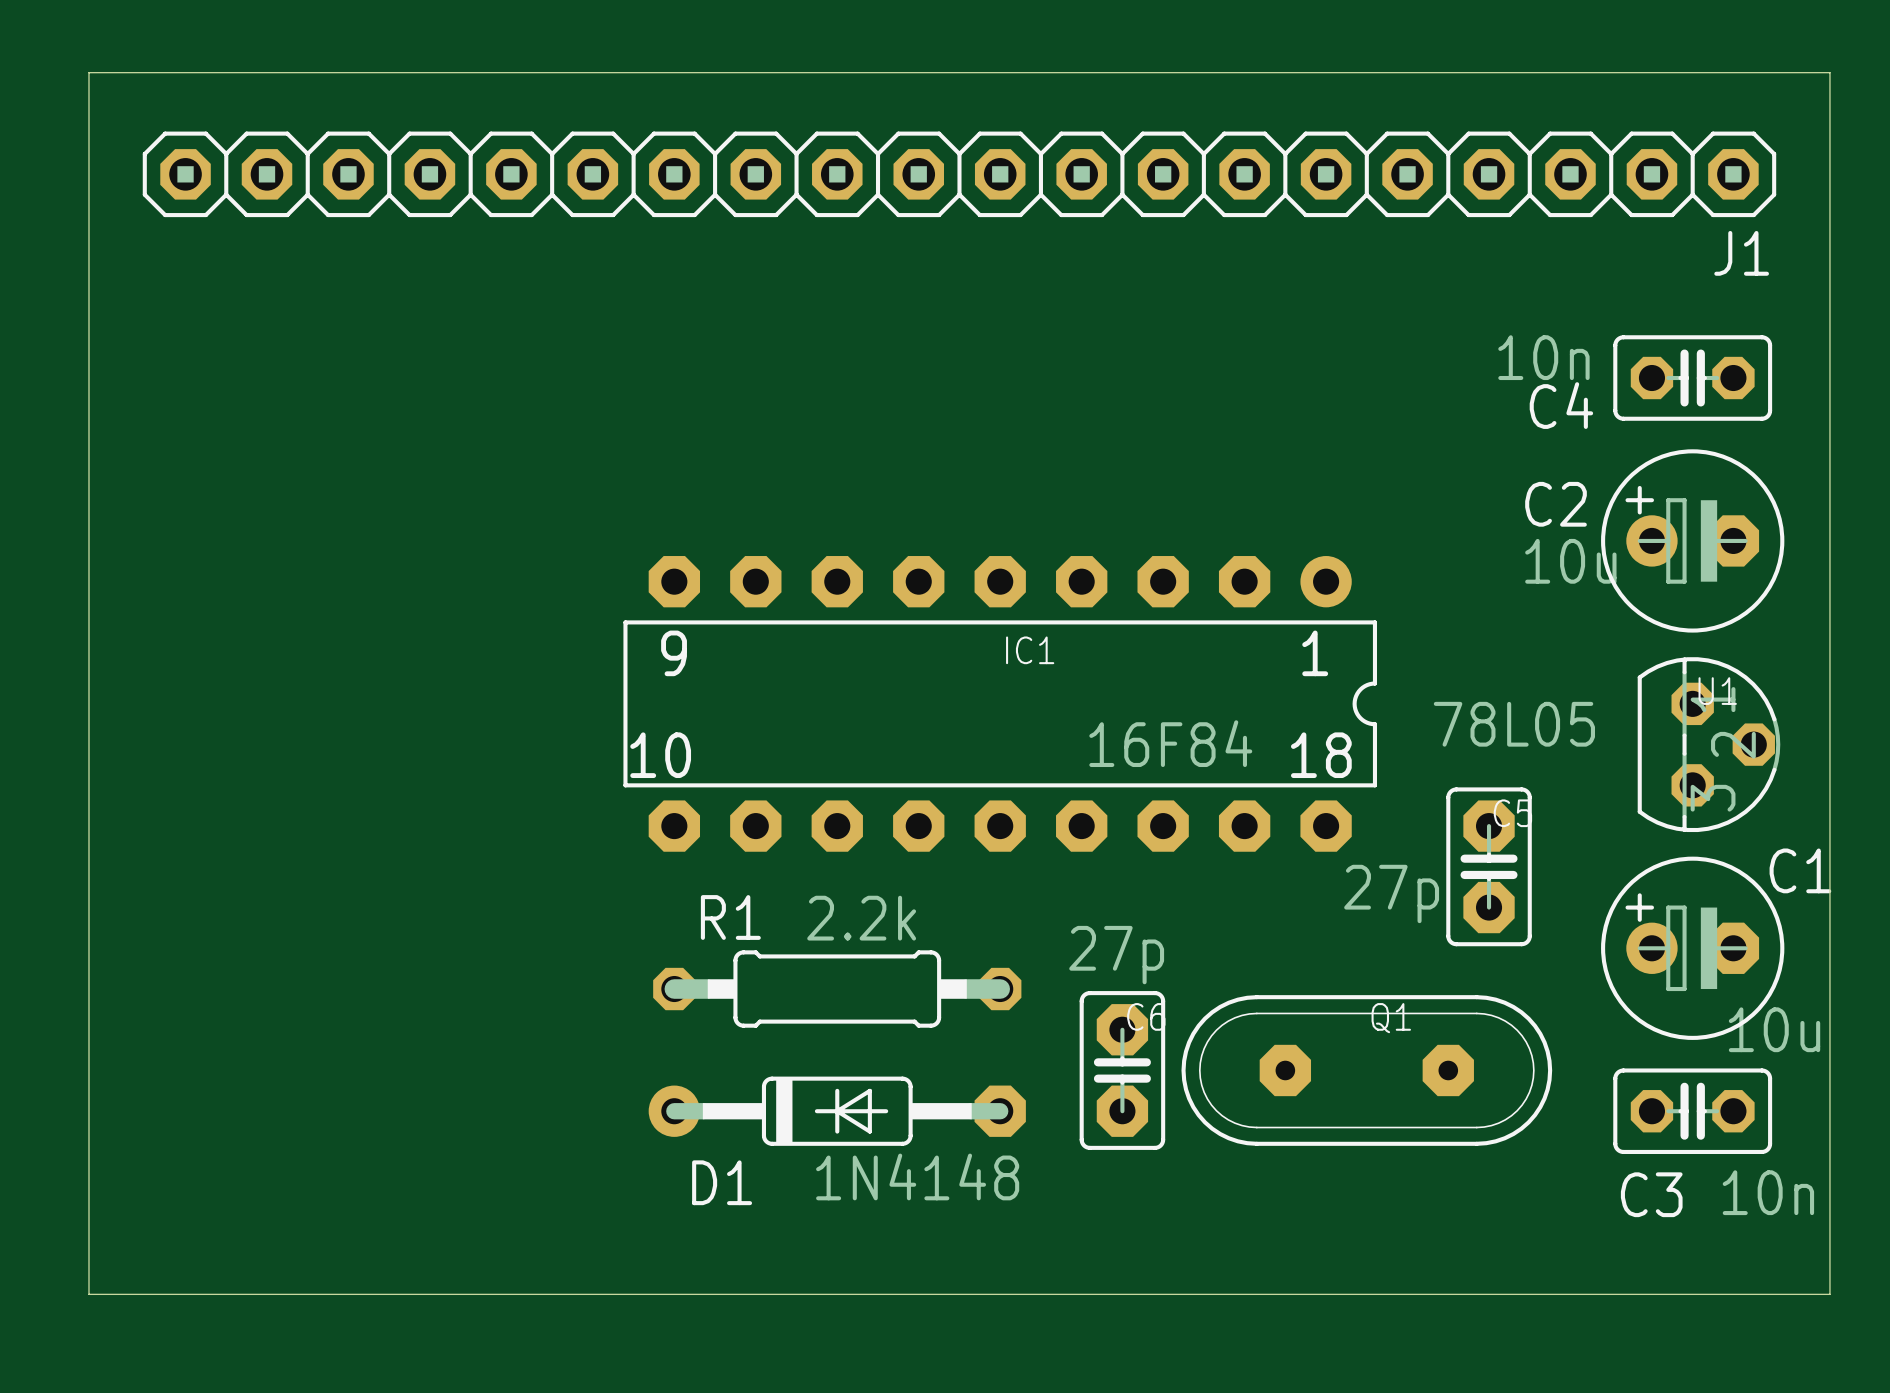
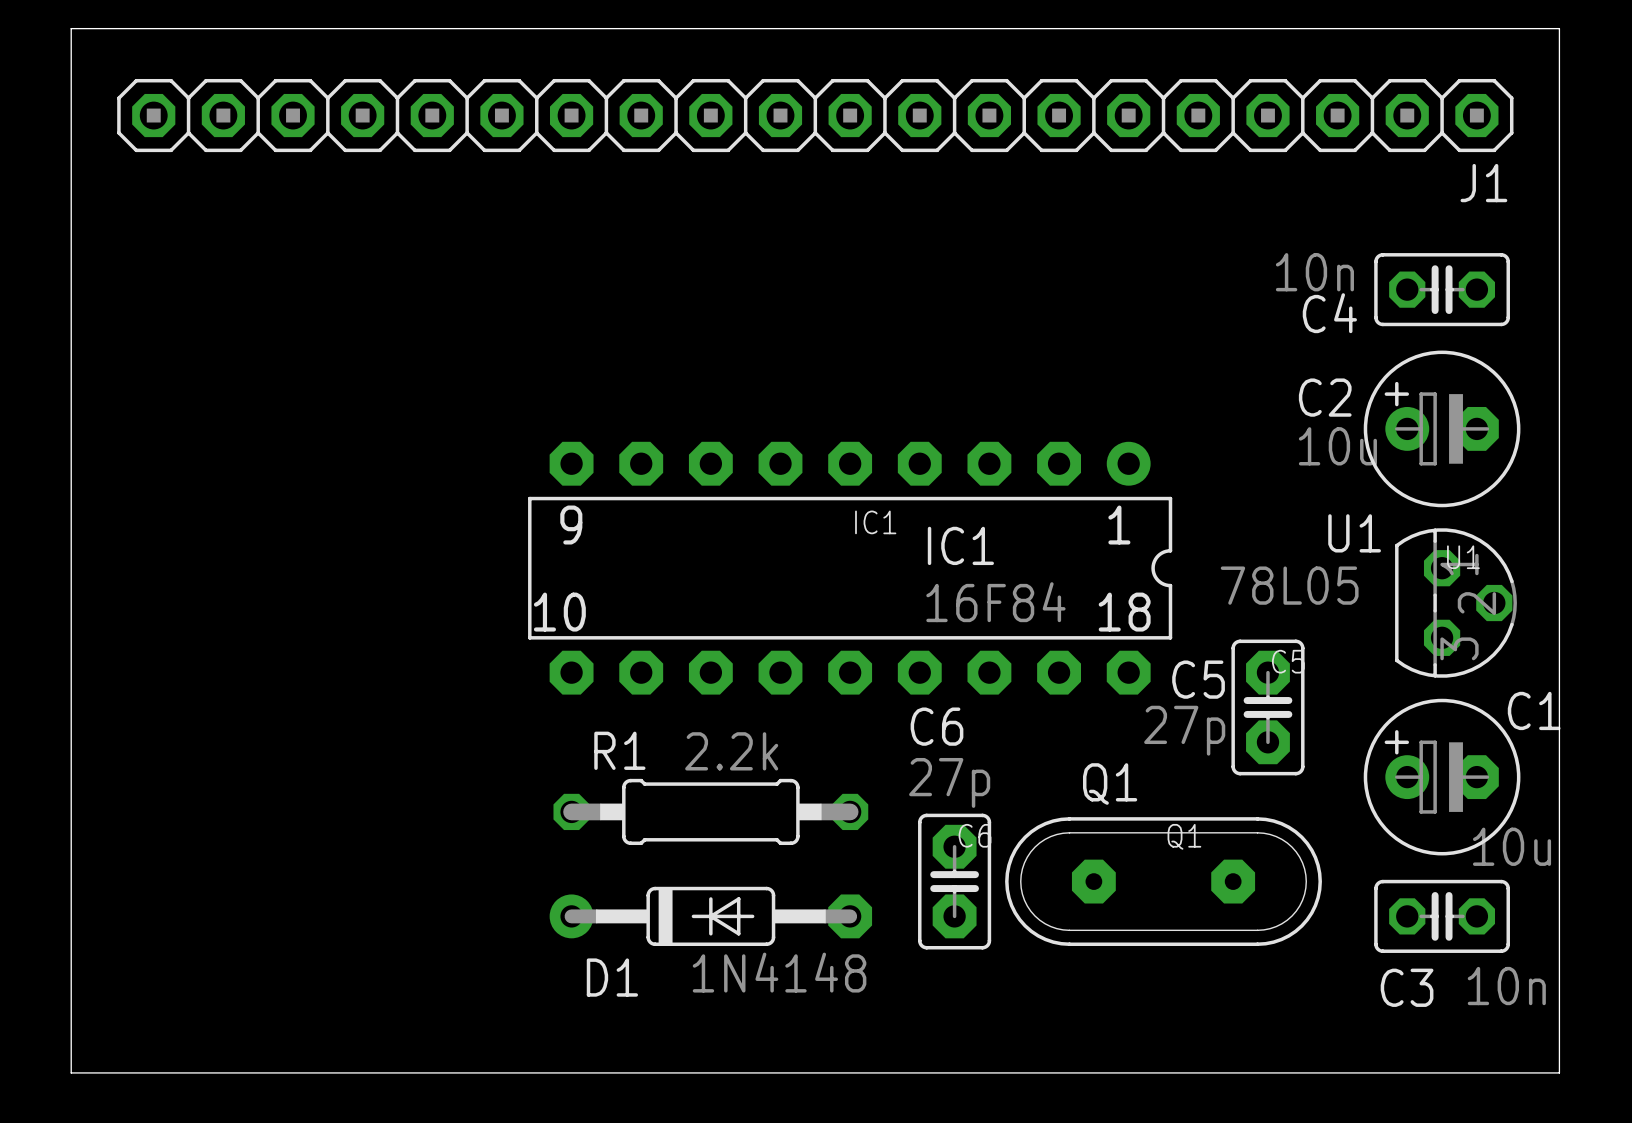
U1 name: none -> U1 (1354, 533)
IC1 name: none -> IC1 (960, 545)
C5 name: none -> C5 (1198, 679)
C6 name: none -> C6 (936, 726)
Q1 name: none -> Q1 (1110, 784)

